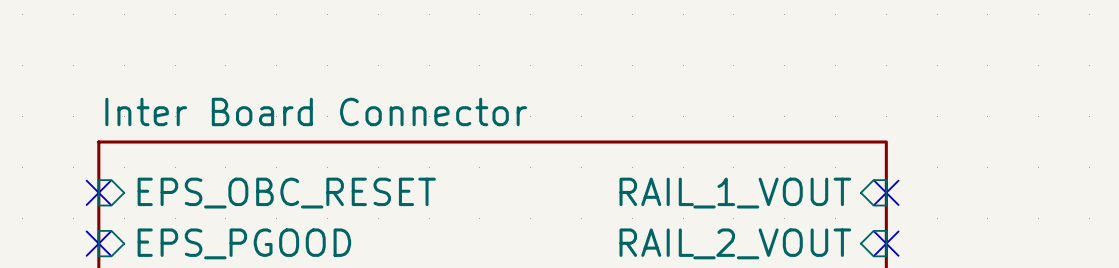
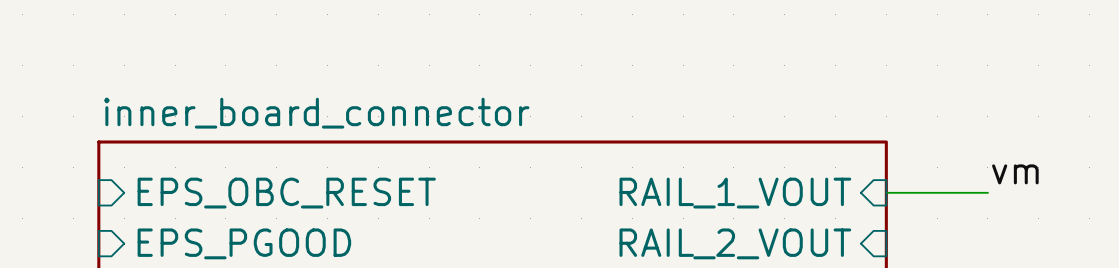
sheet Inter Board Connector name: Inter Board Connector (316, 111) -> inner_board_connector (316, 113)
label: none -> vm (1015, 174)
no-connect mark: (98, 192) -> none
wire: none -> (886, 192) (987, 192)
no-connect mark: (886, 192) -> none
no-connect mark: (98, 243) -> none
no-connect mark: (886, 243) -> none

